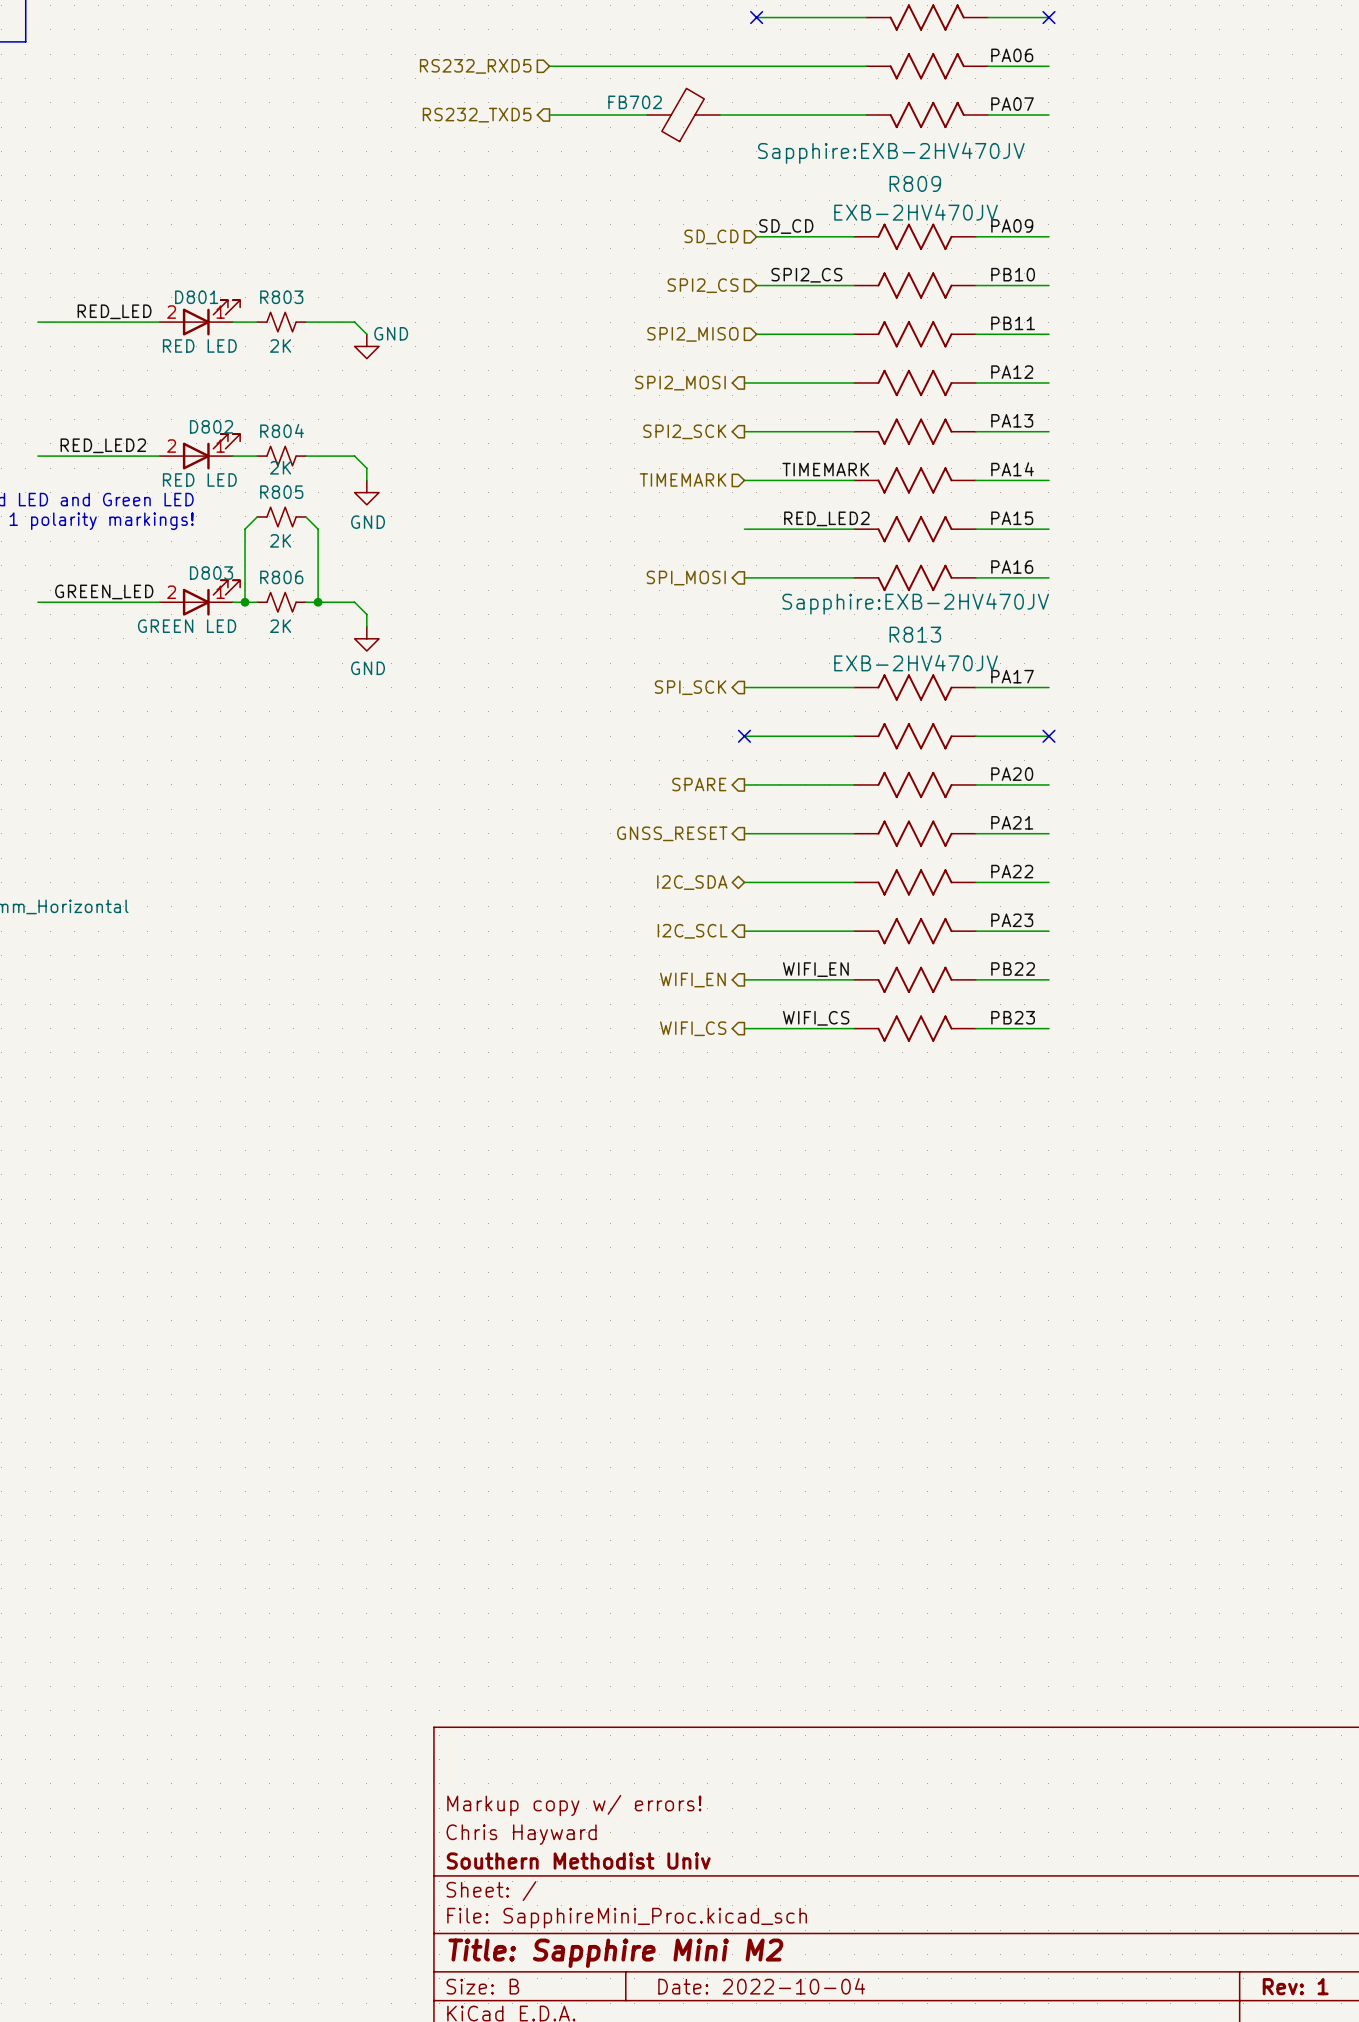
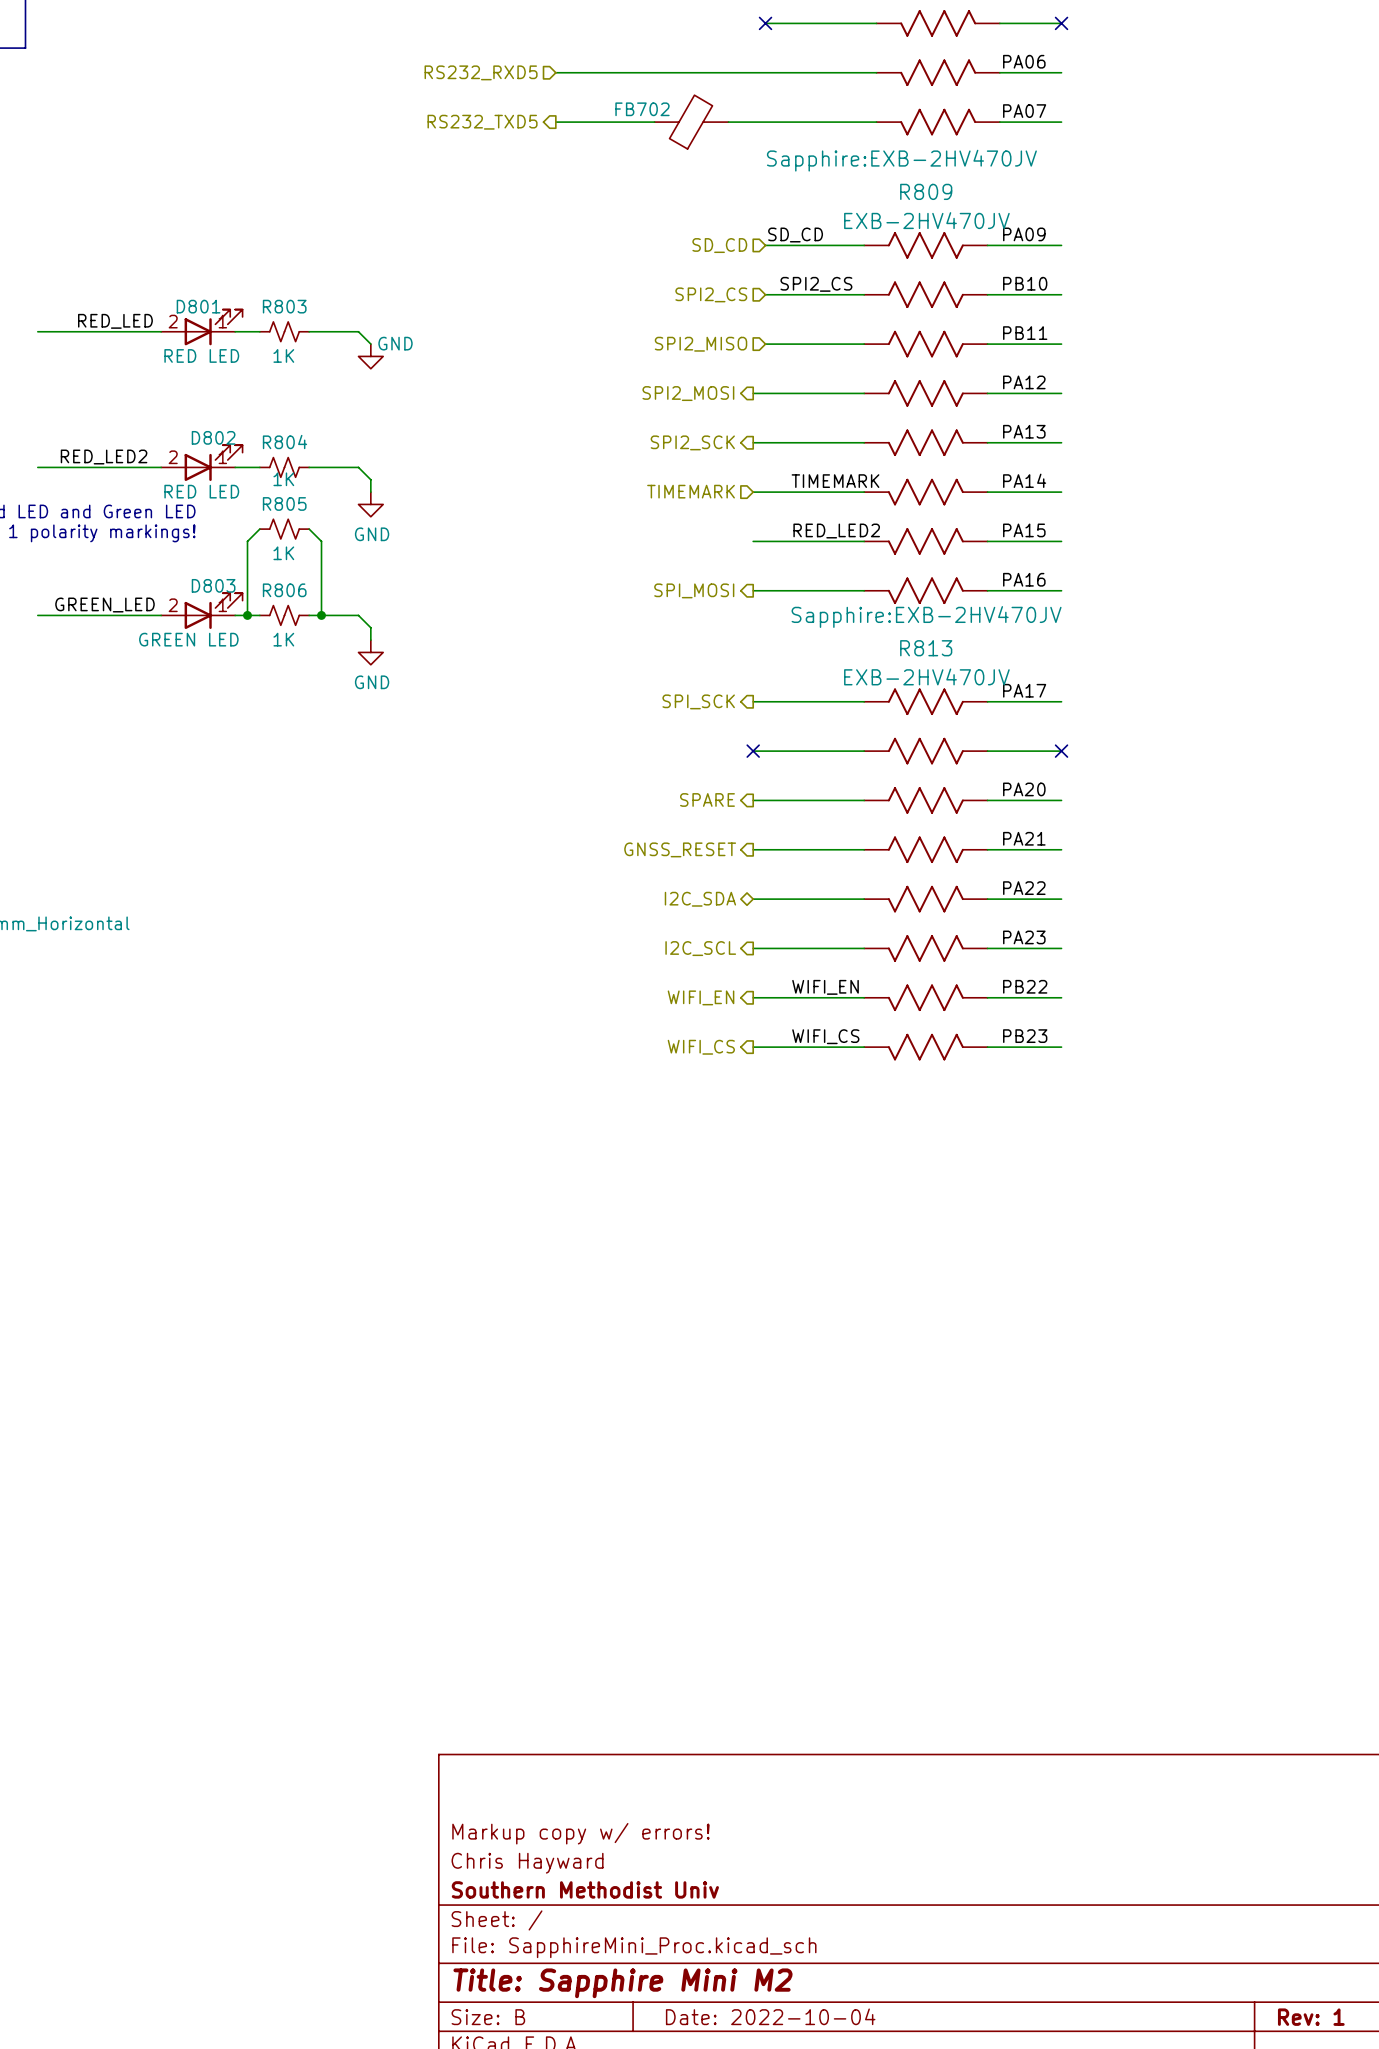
R803 value: 2K (280, 345) -> 1K (283, 355)
R804 value: 2K (280, 467) -> 1K (283, 479)
R805 value: 2K (280, 540) -> 1K (283, 553)
R806 value: 2K (280, 626) -> 1K (283, 639)

